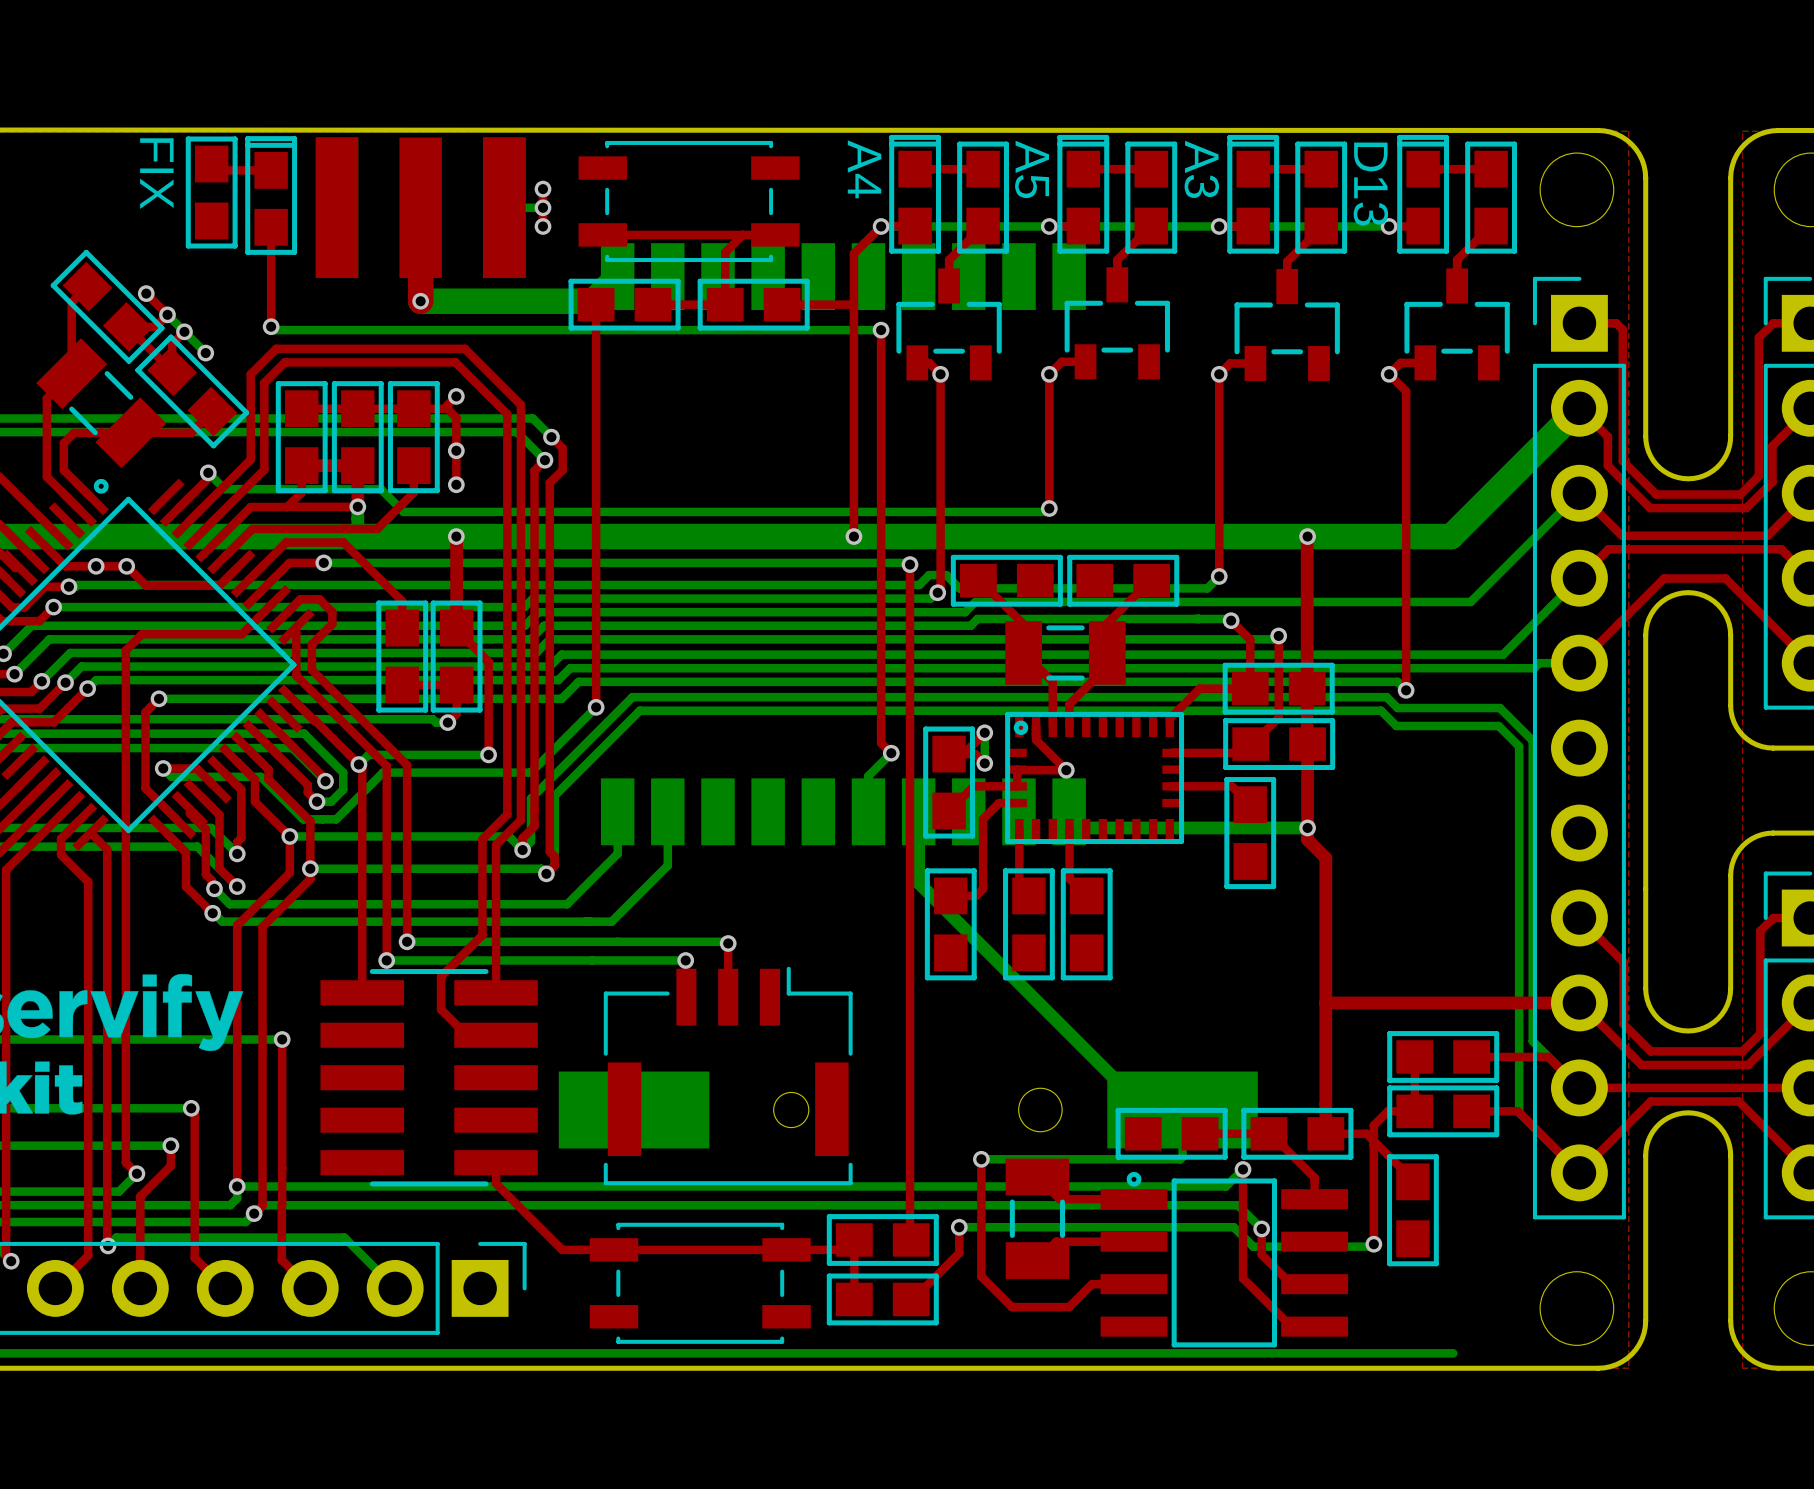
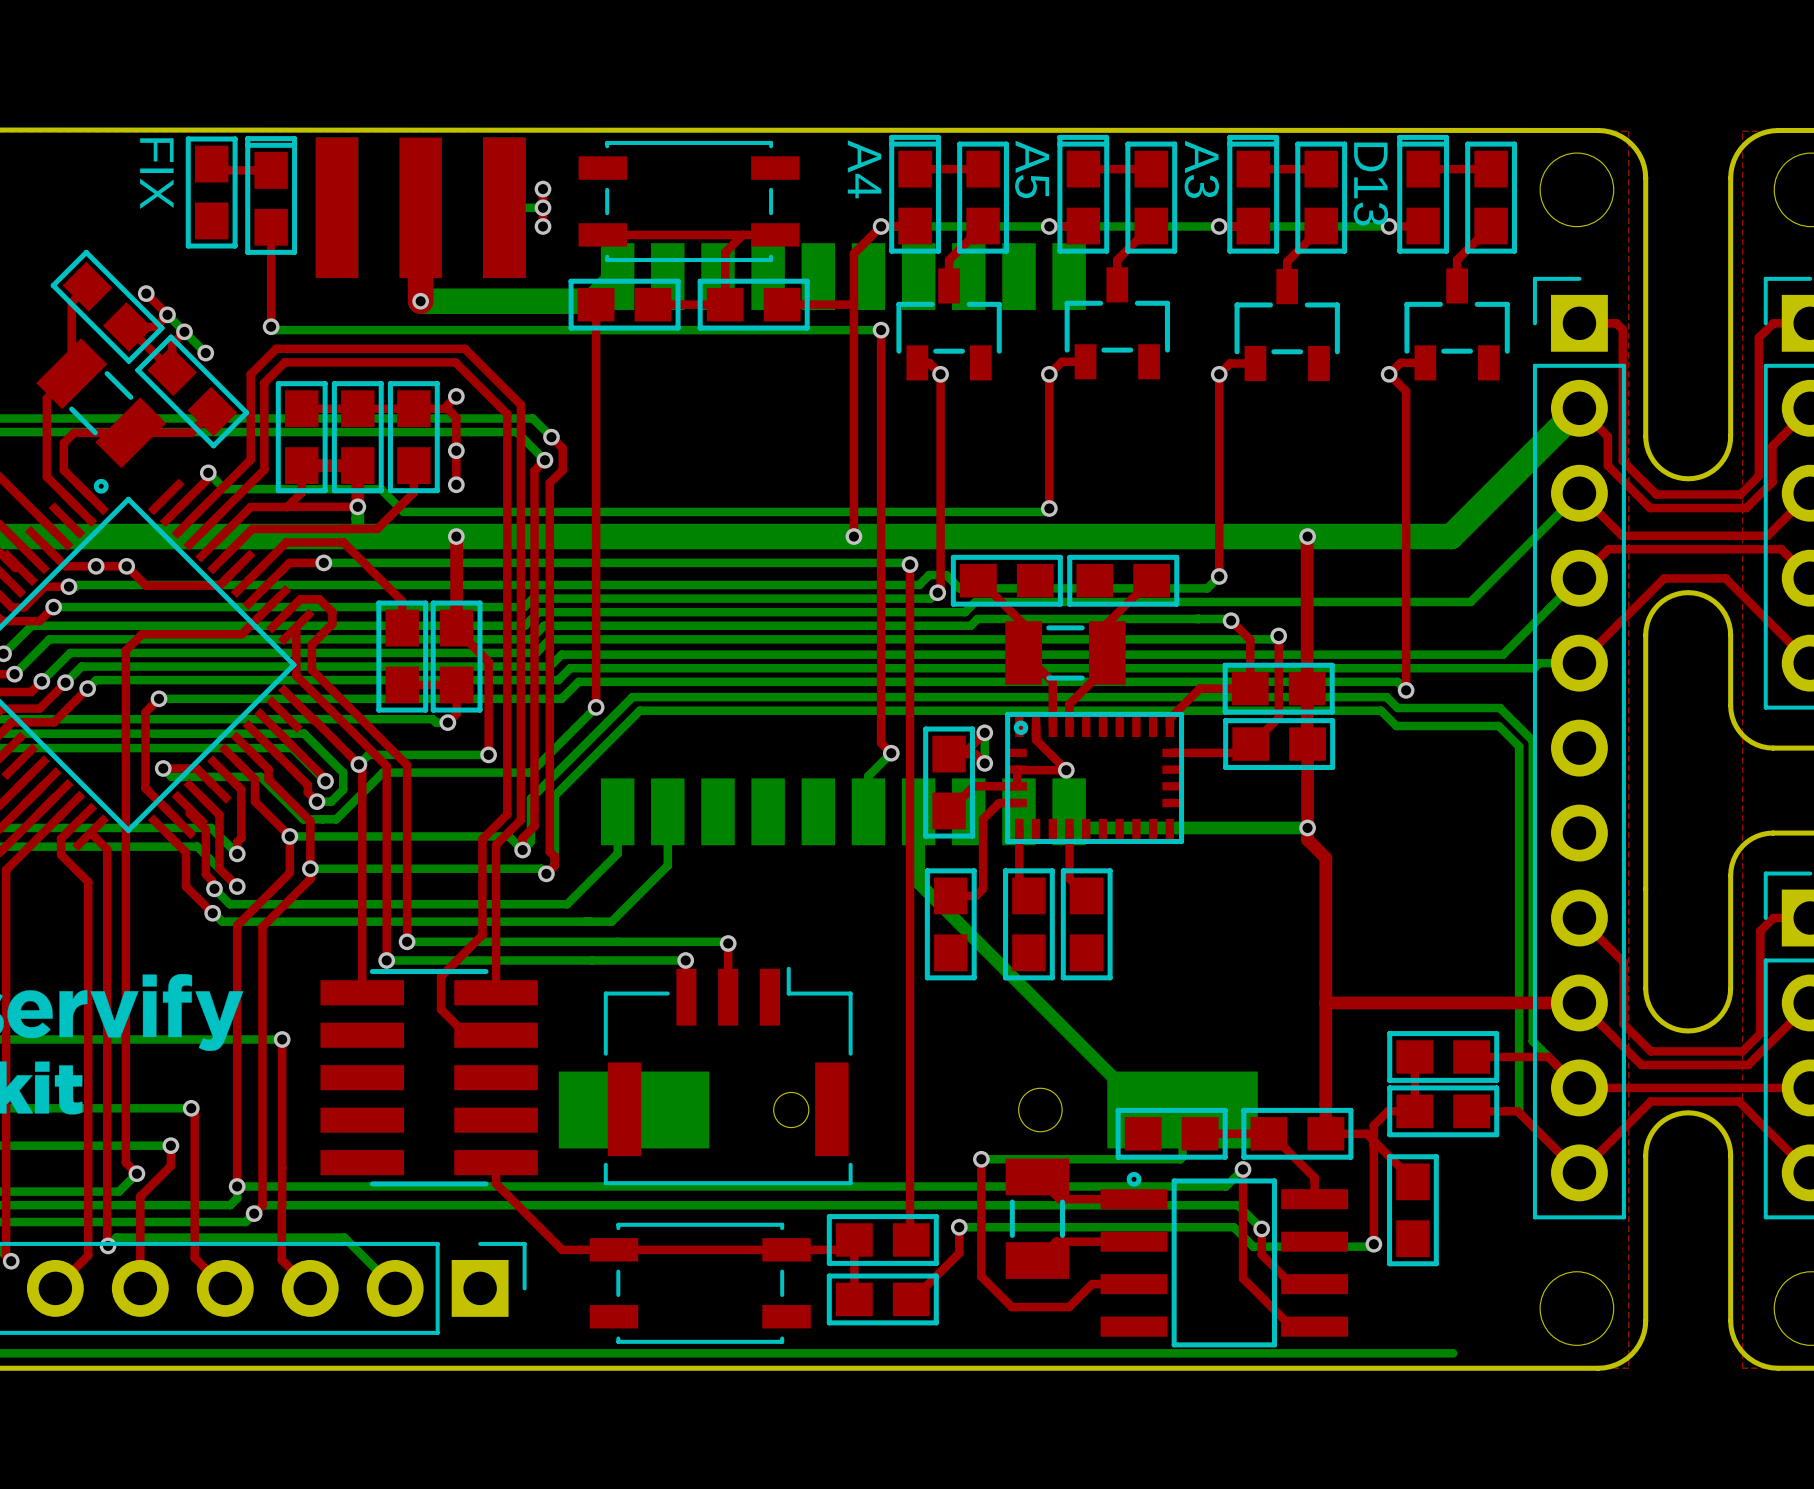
top track: (1171, 786) (1231, 786) (1250, 804) -> none
part: (1250, 833) -> none

